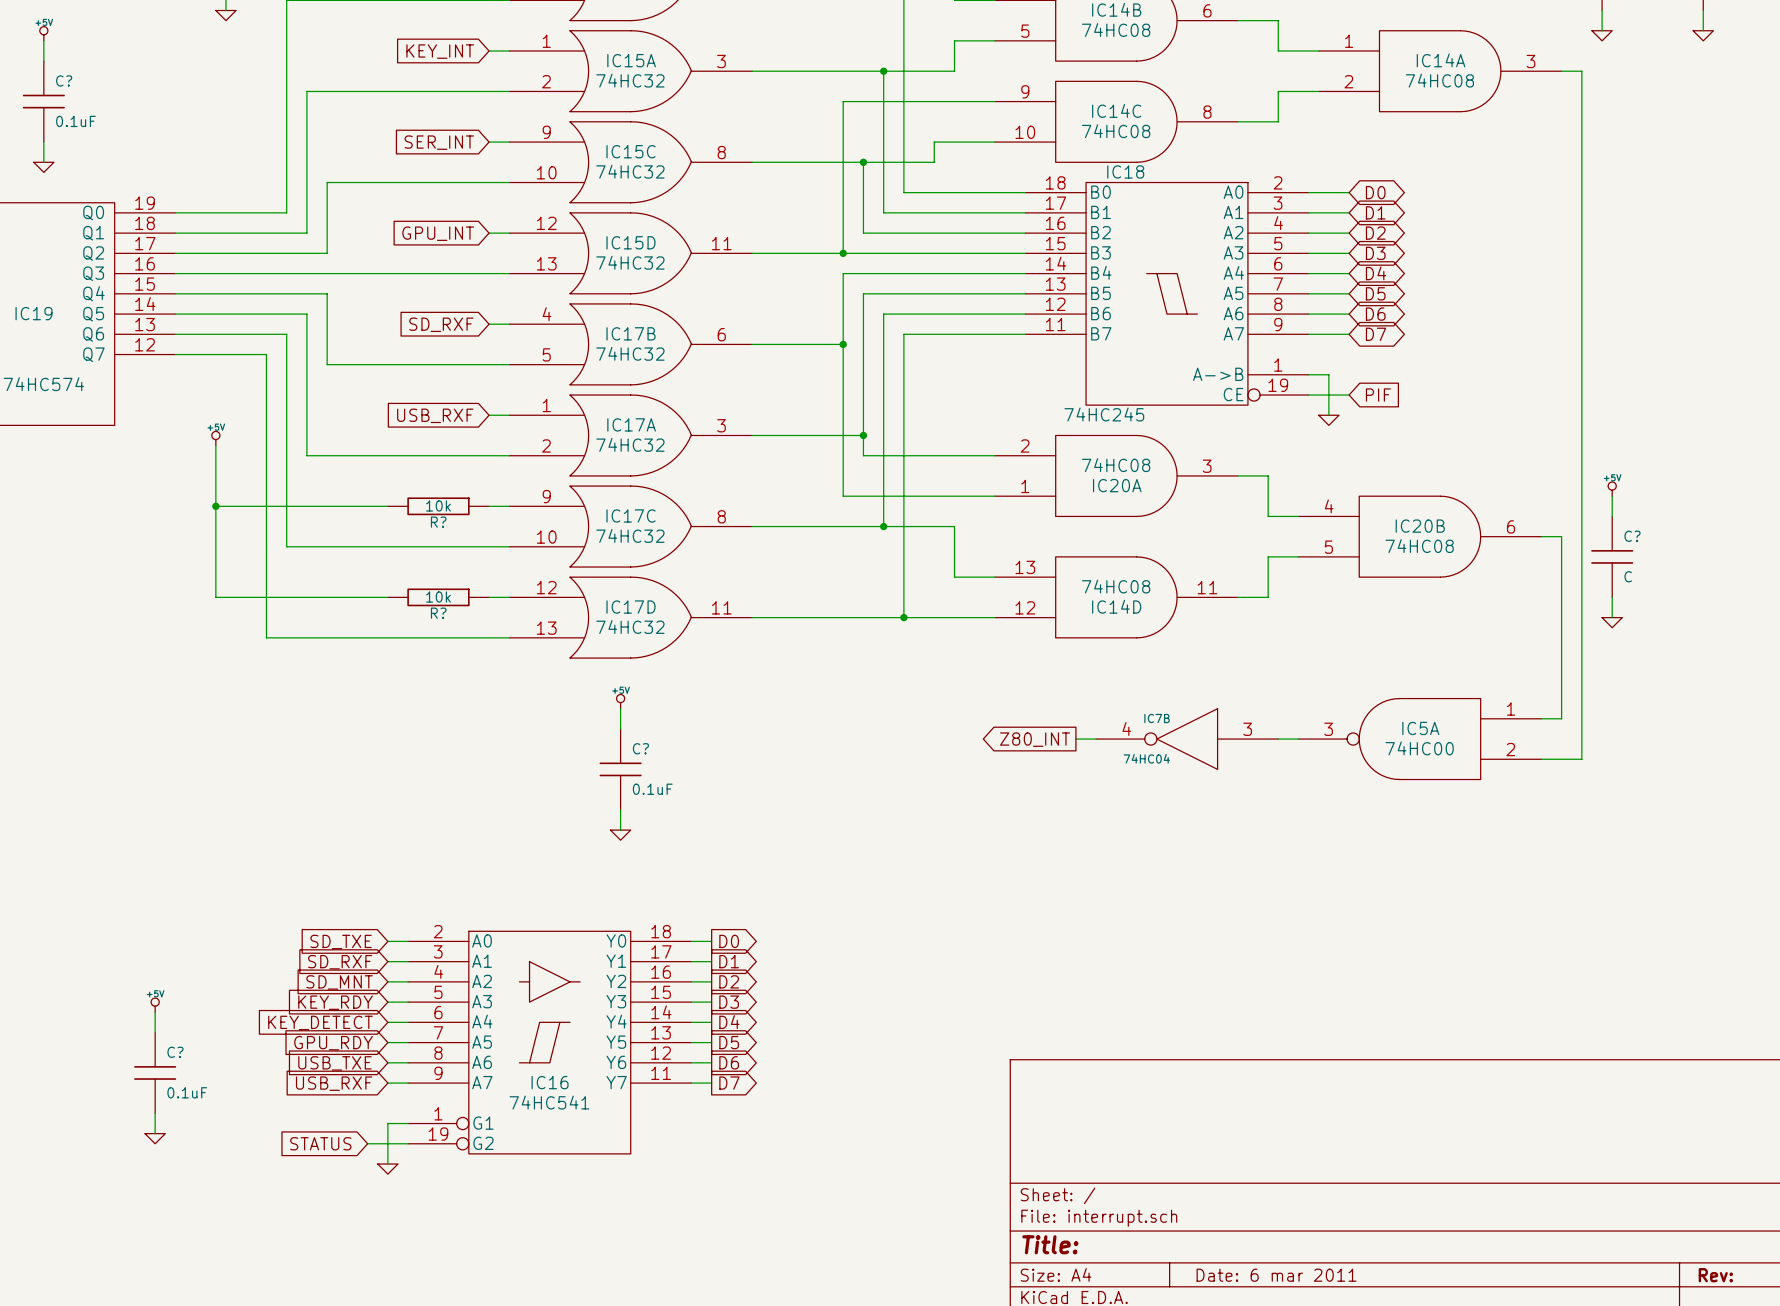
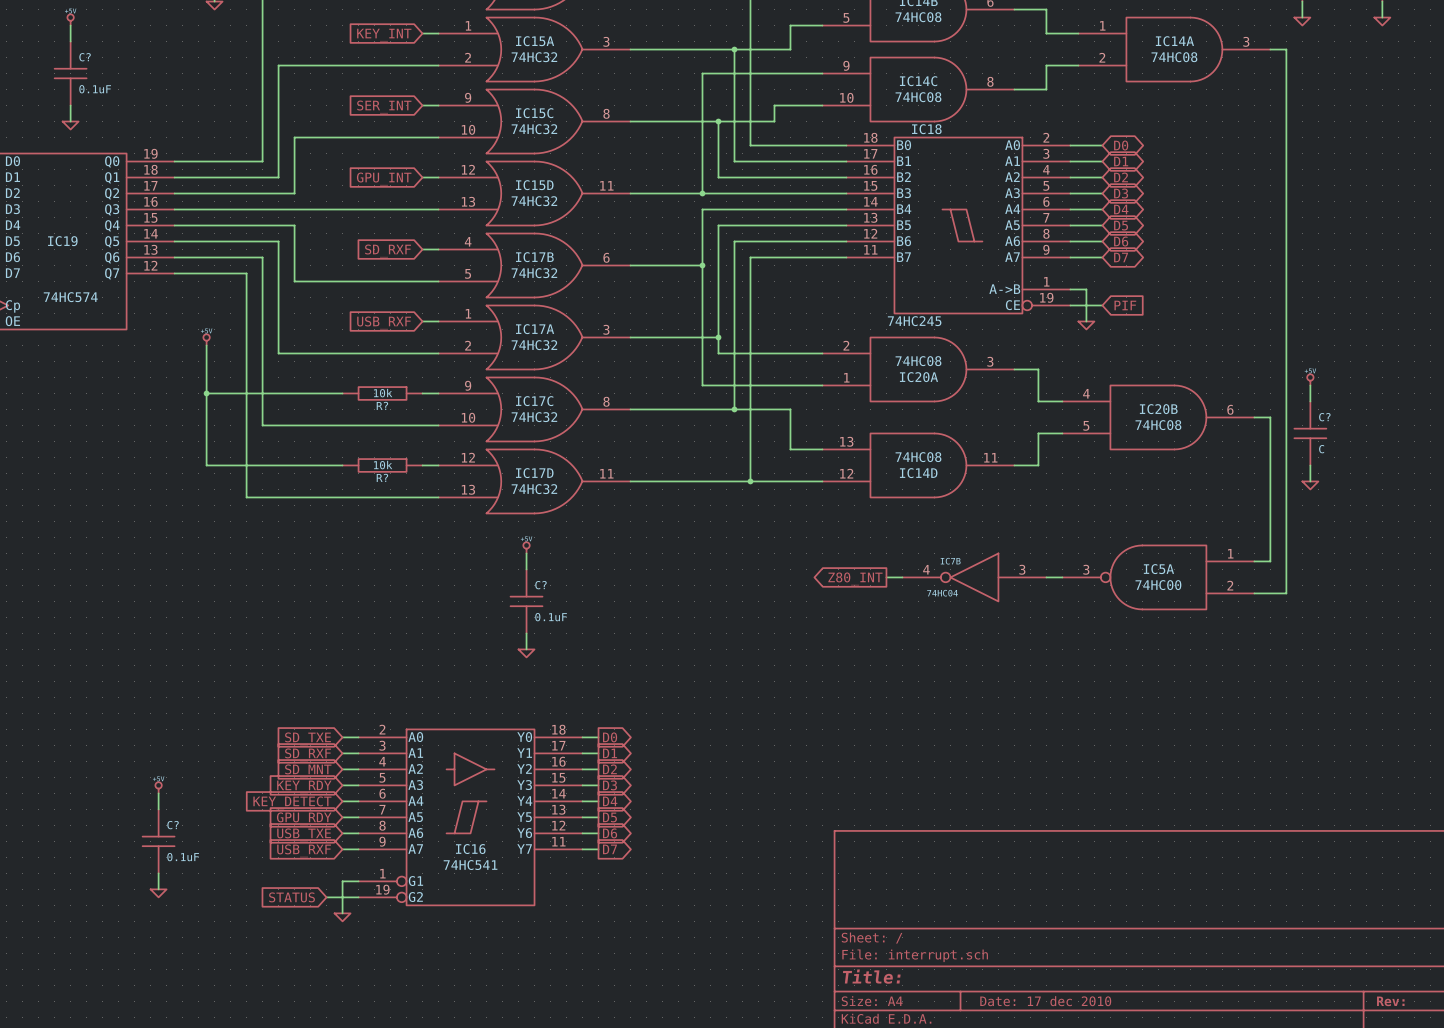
title block: Date: 6 mar 2011 (1276, 1275) -> Date: 17 dec 2010 (1045, 1001)

